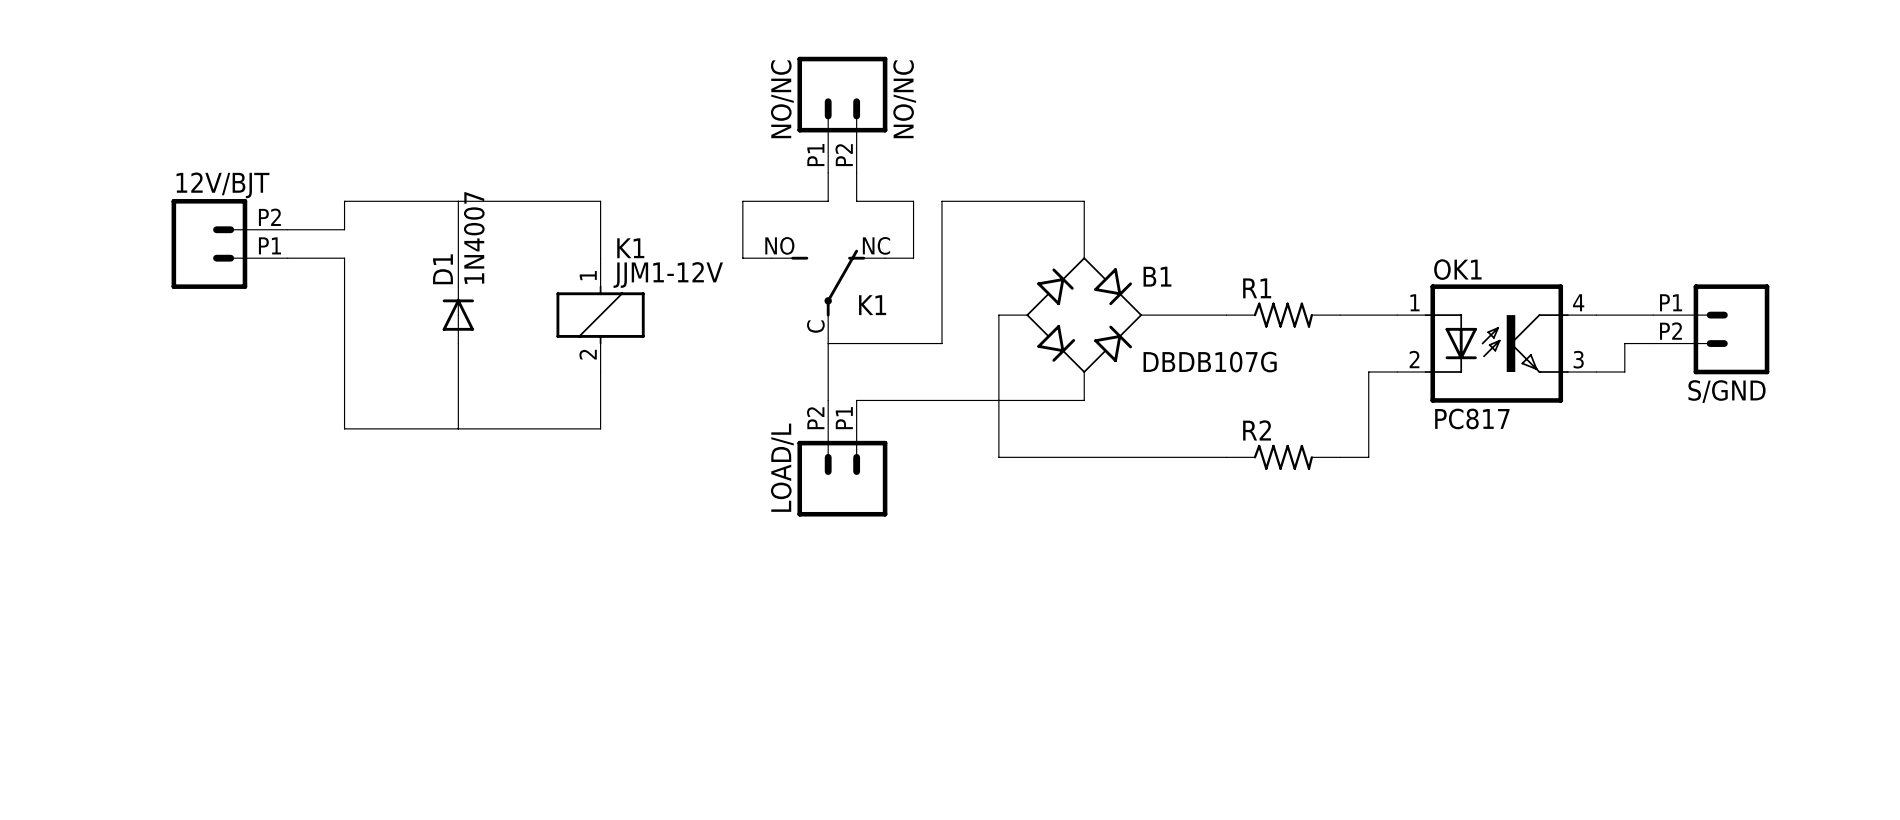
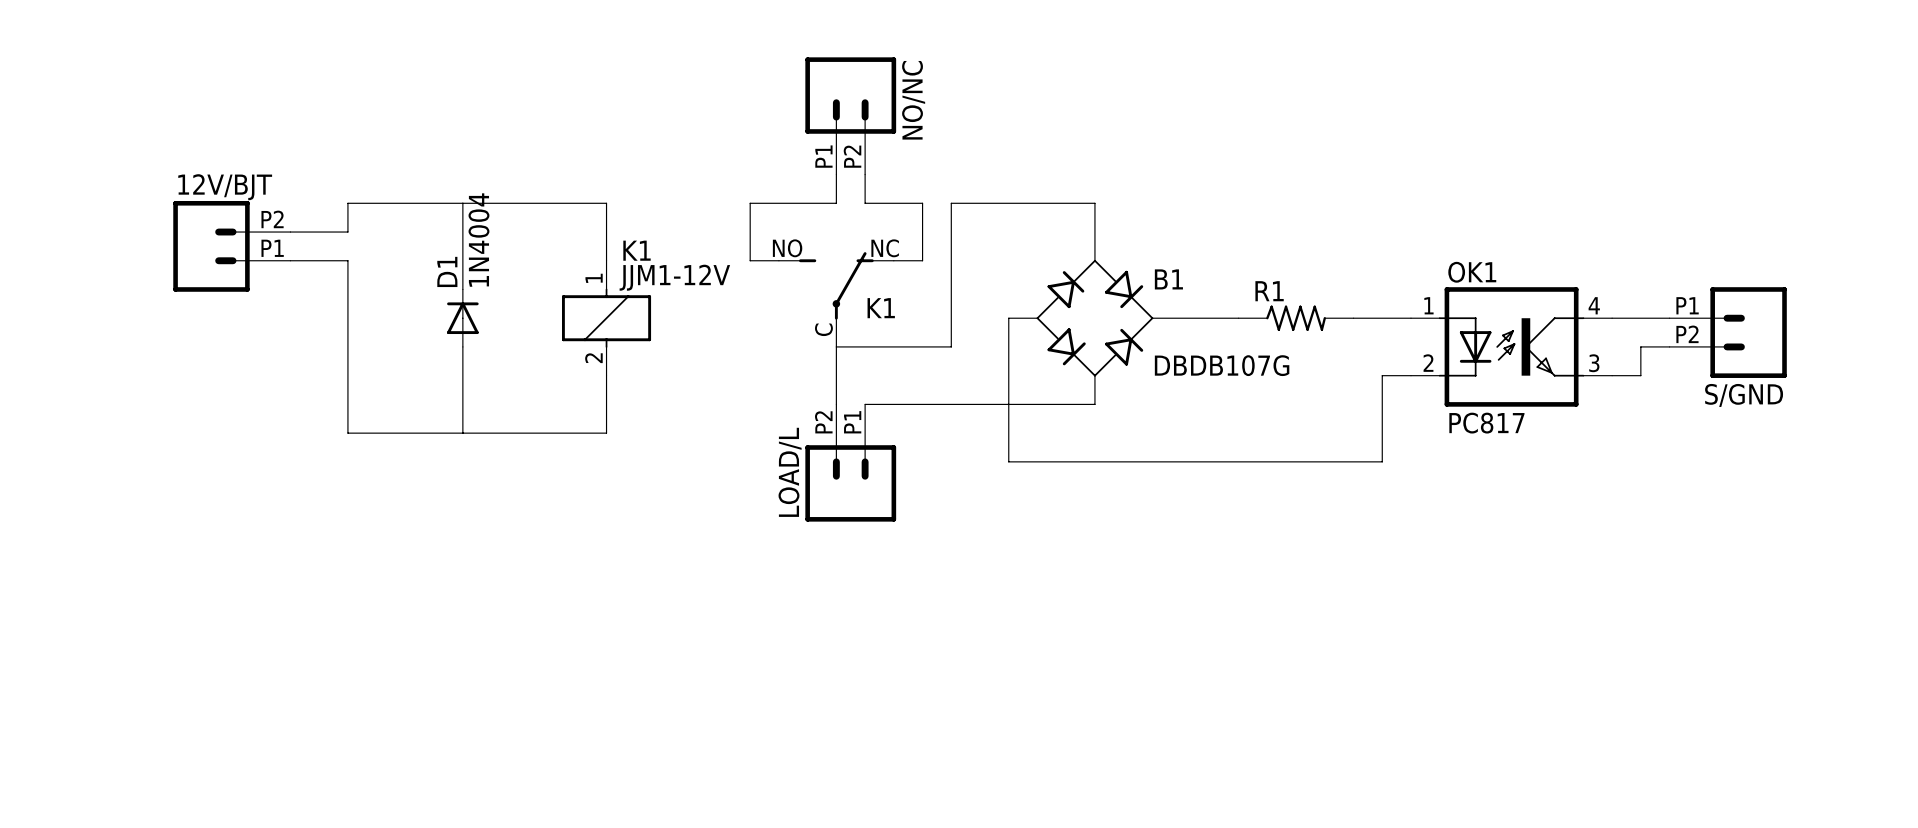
NO/NC value: NO/NC (782, 99) -> none
D1 value: 1N4007 (474, 238) -> 1N4004 (478, 240)
R2: (1283, 457) -> none

